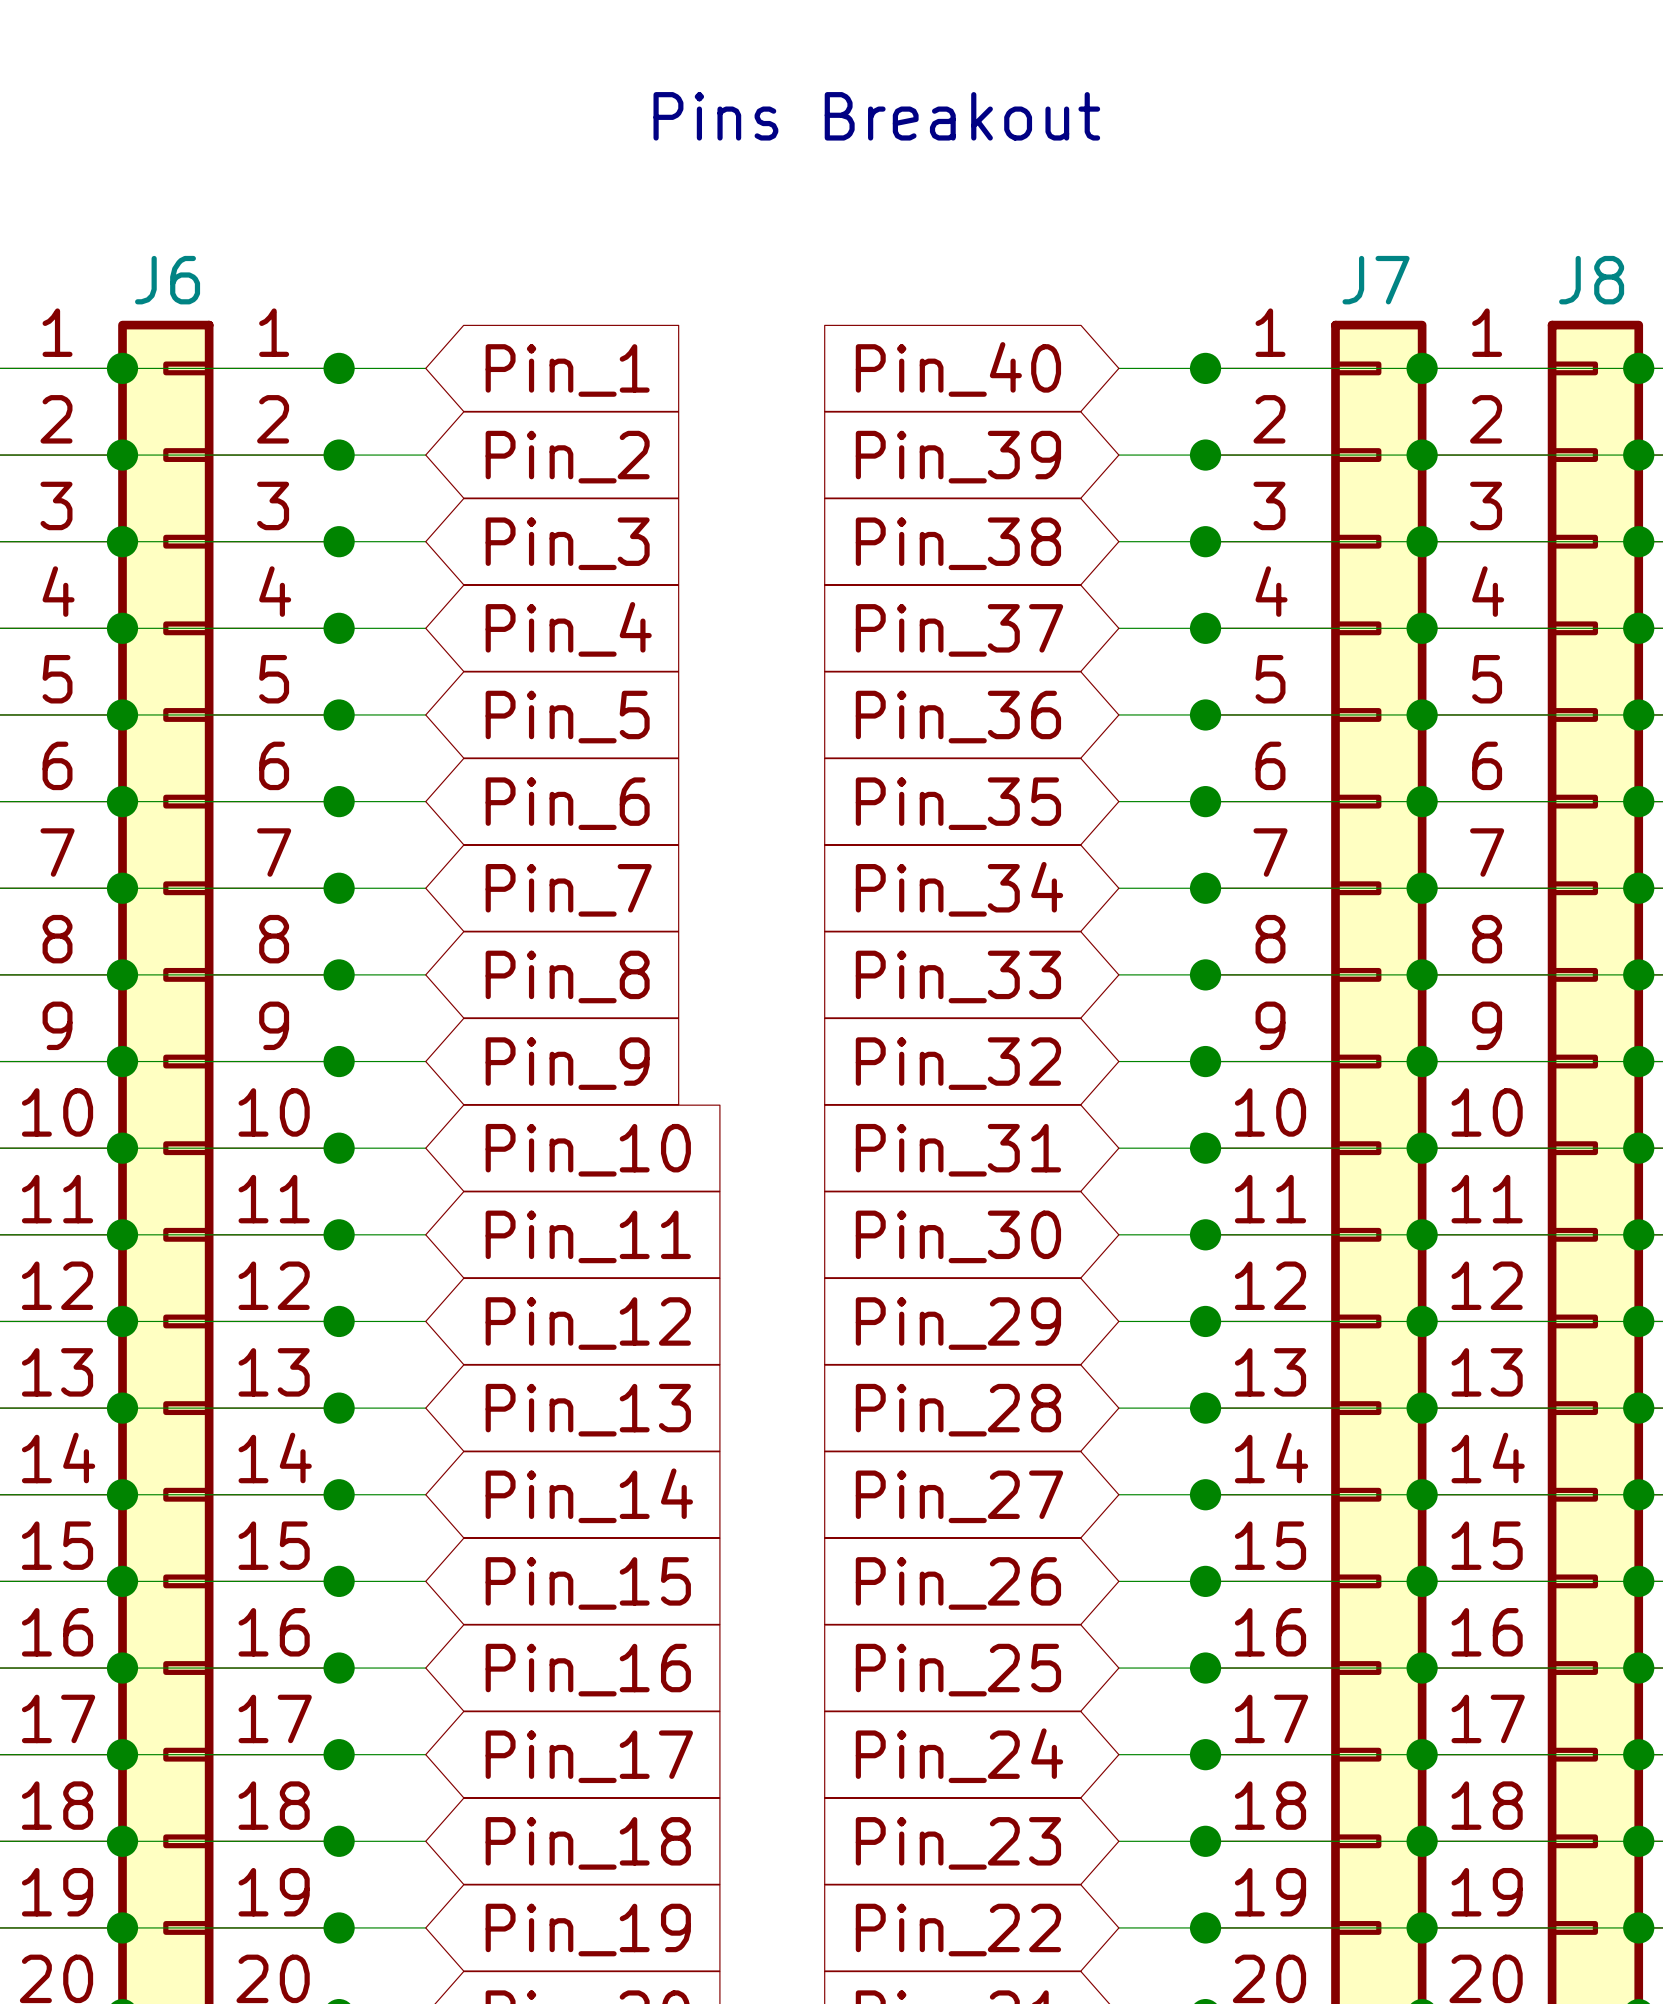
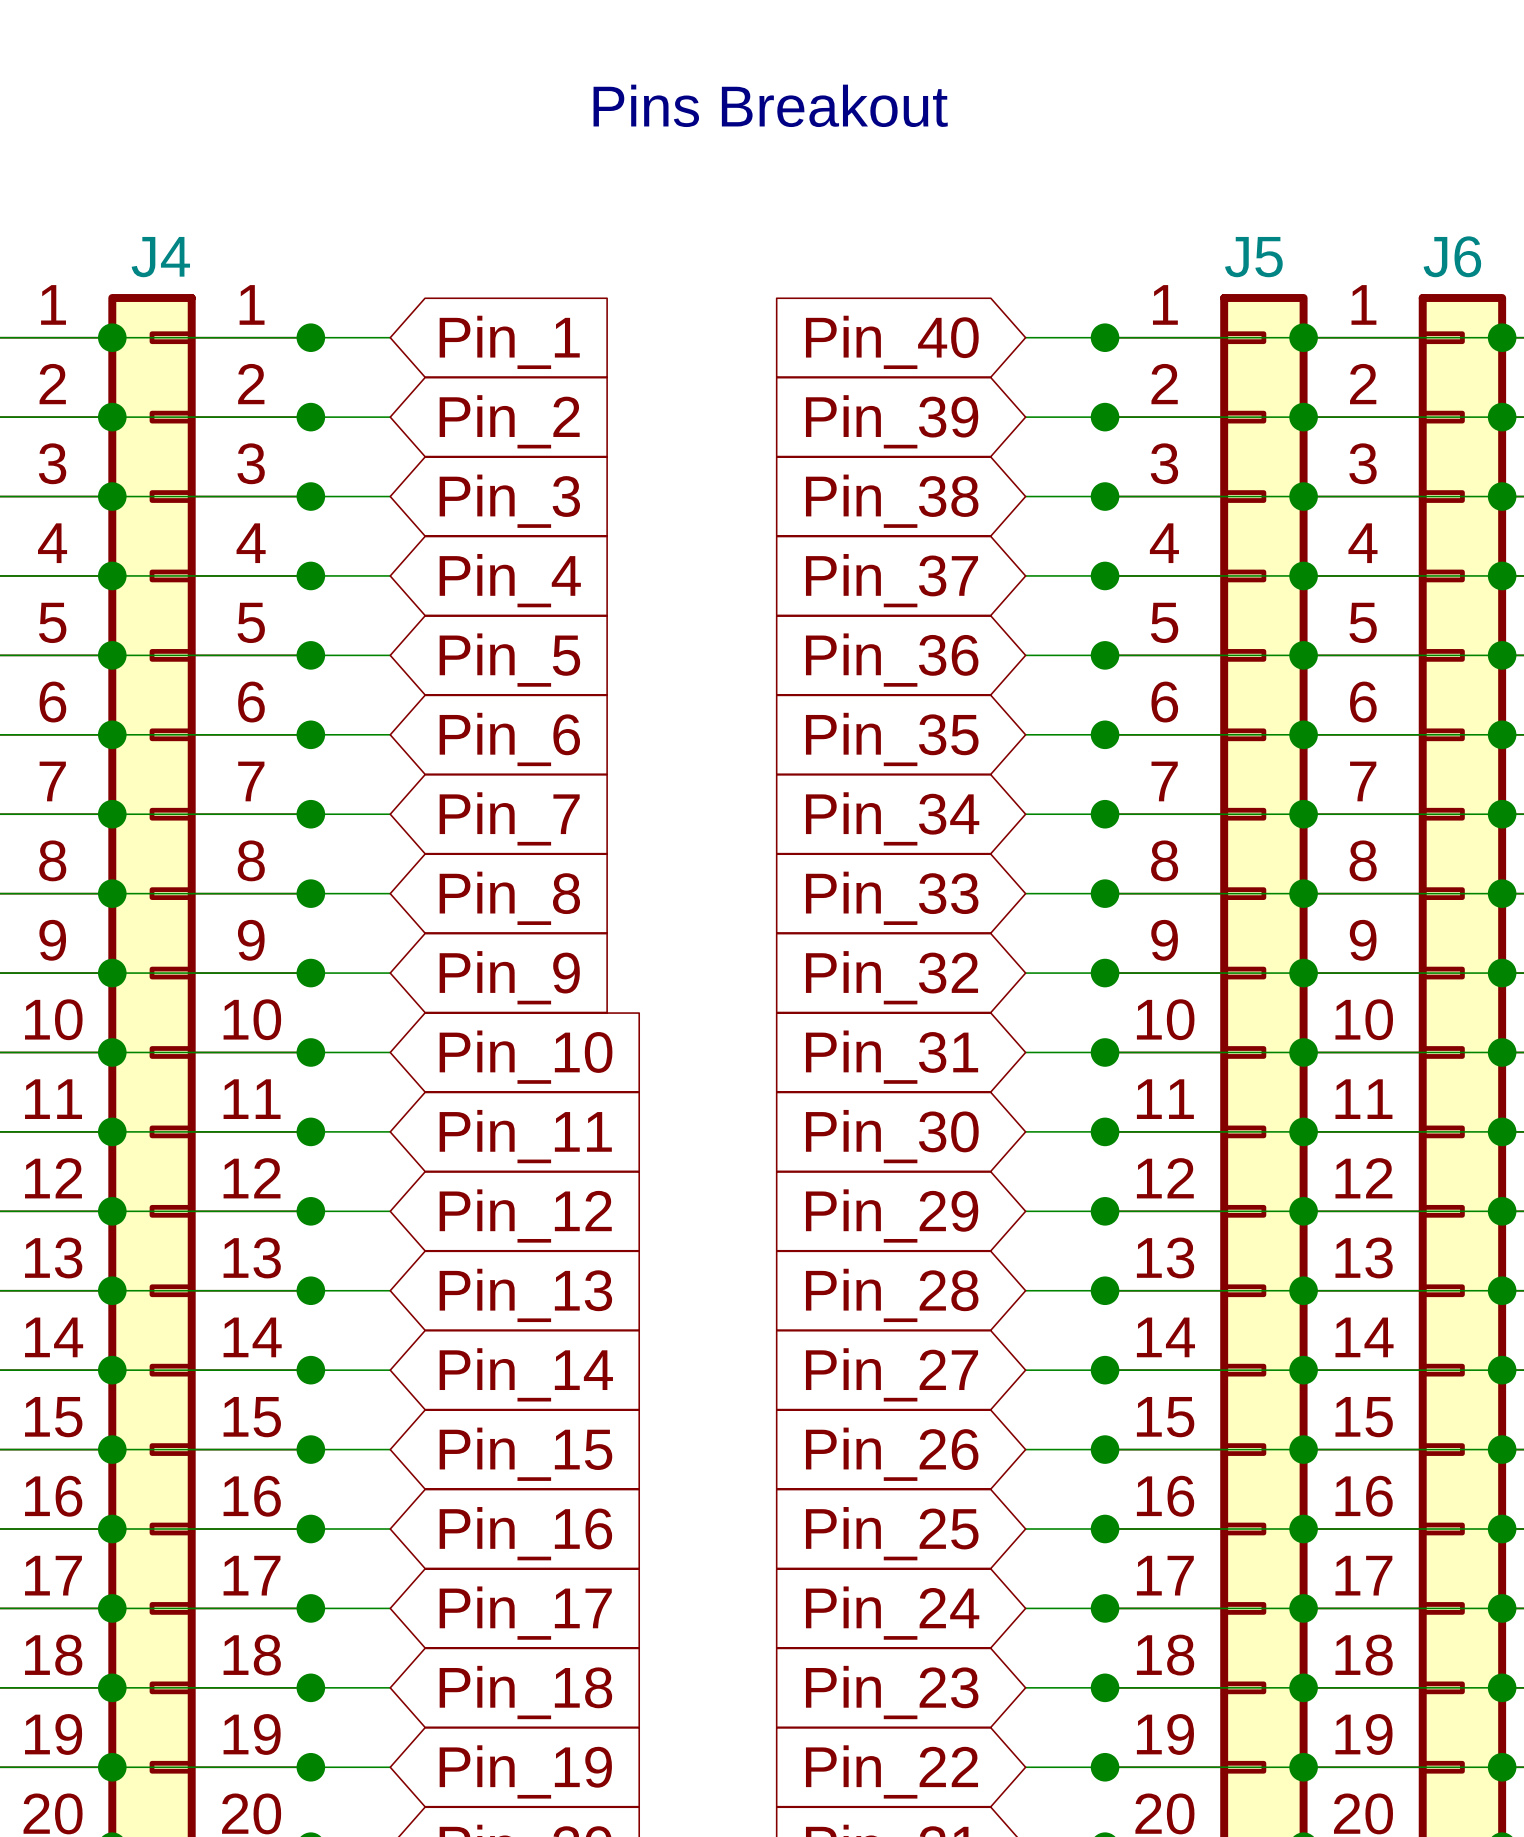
J6 name: J6 (167, 280) -> J4 (160, 257)
J7 name: J7 (1376, 280) -> J5 (1253, 257)
J8 name: J8 (1591, 280) -> J6 (1452, 256)

